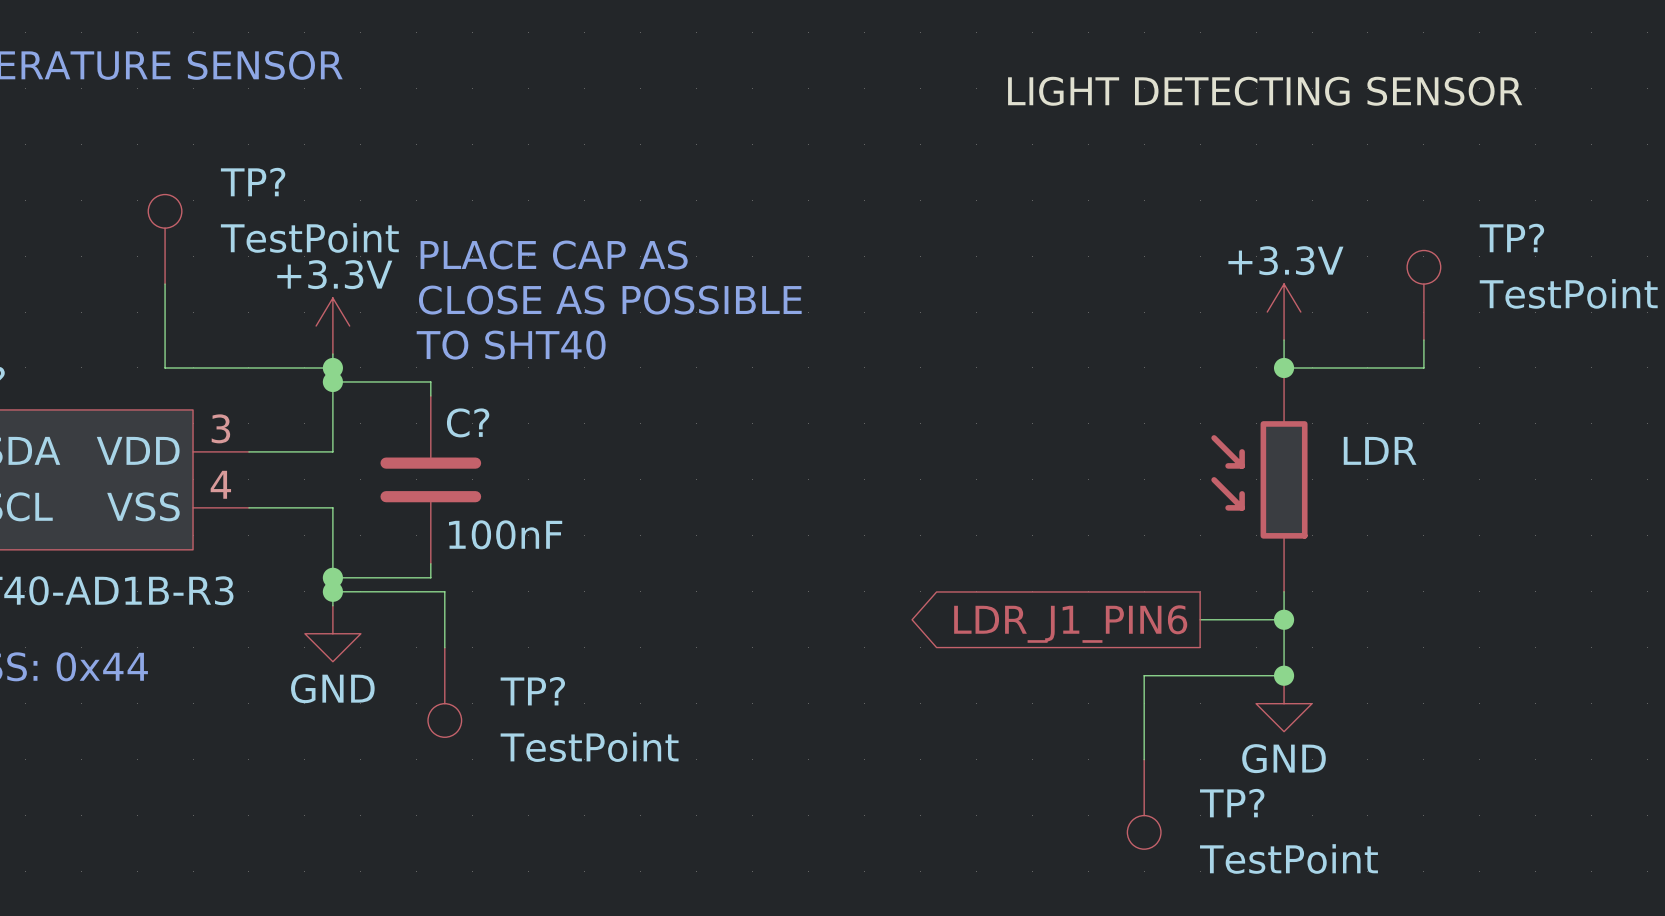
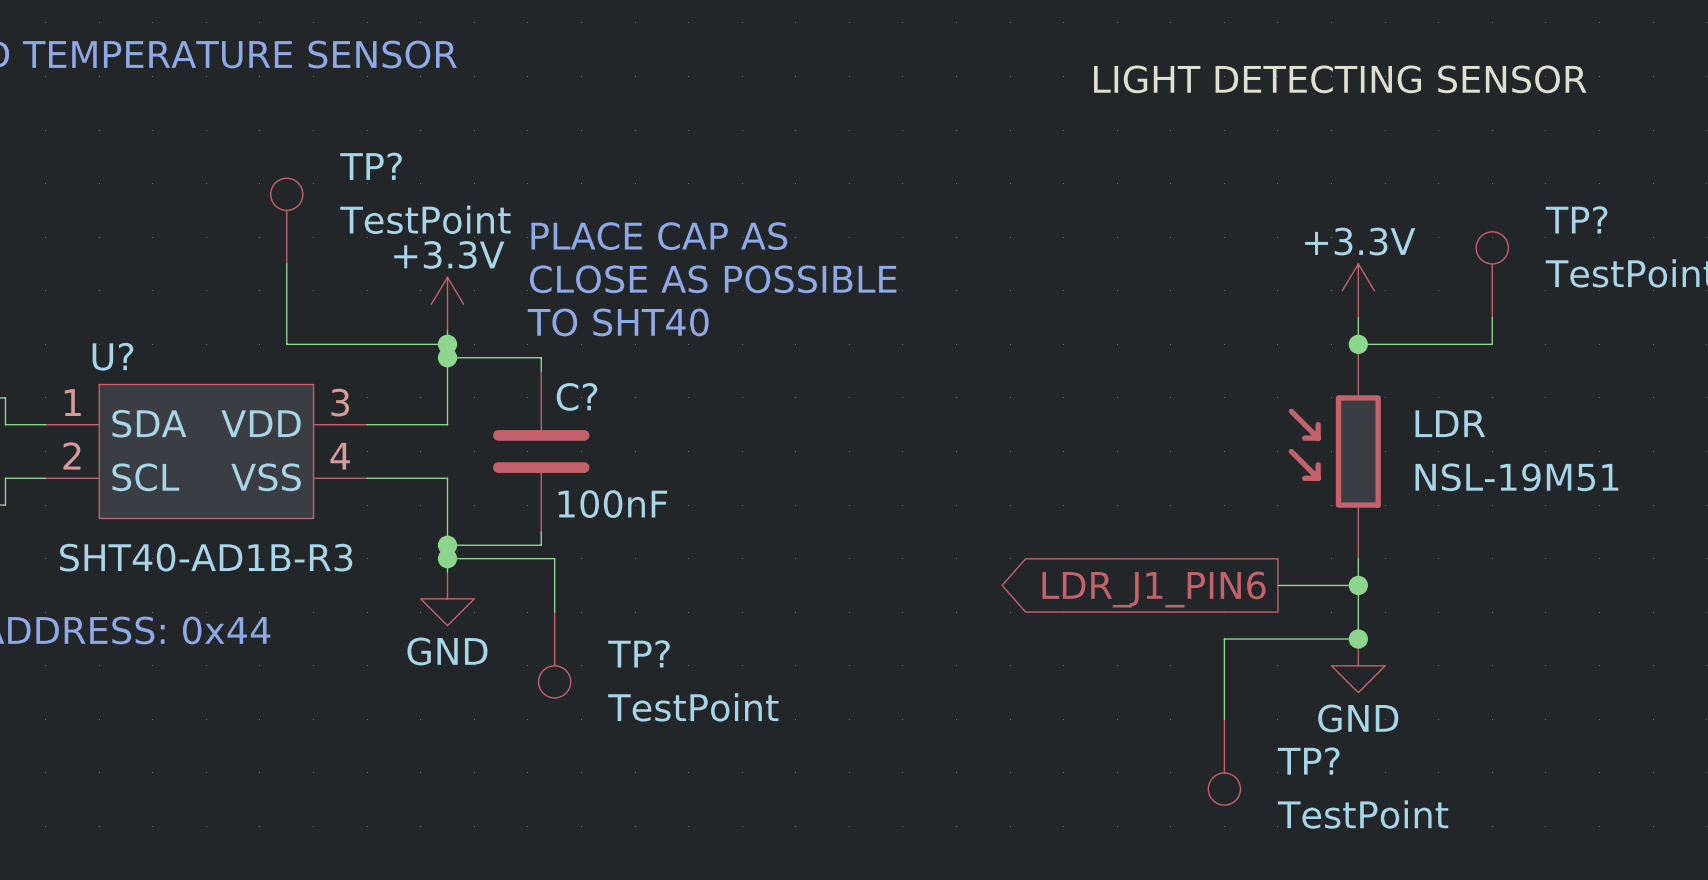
LDR value: none -> NSL-19M51 (1516, 477)

